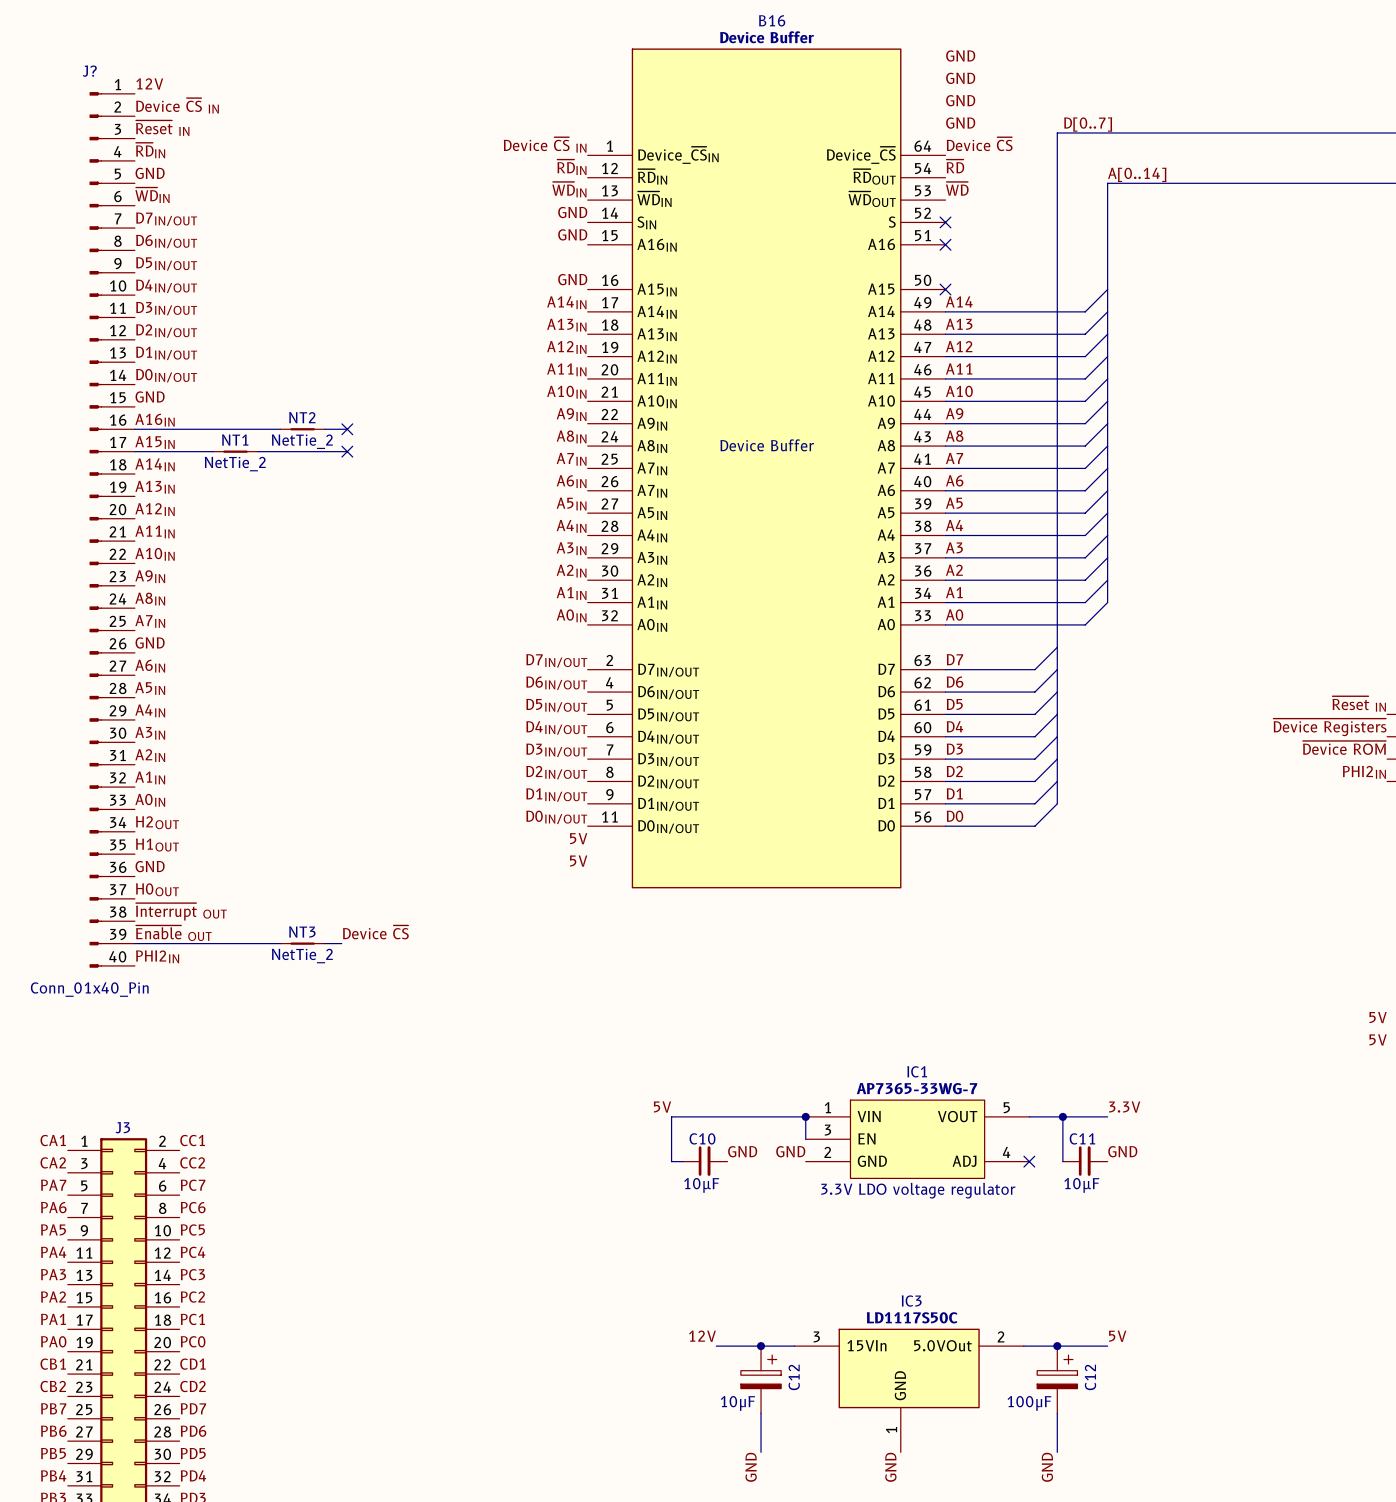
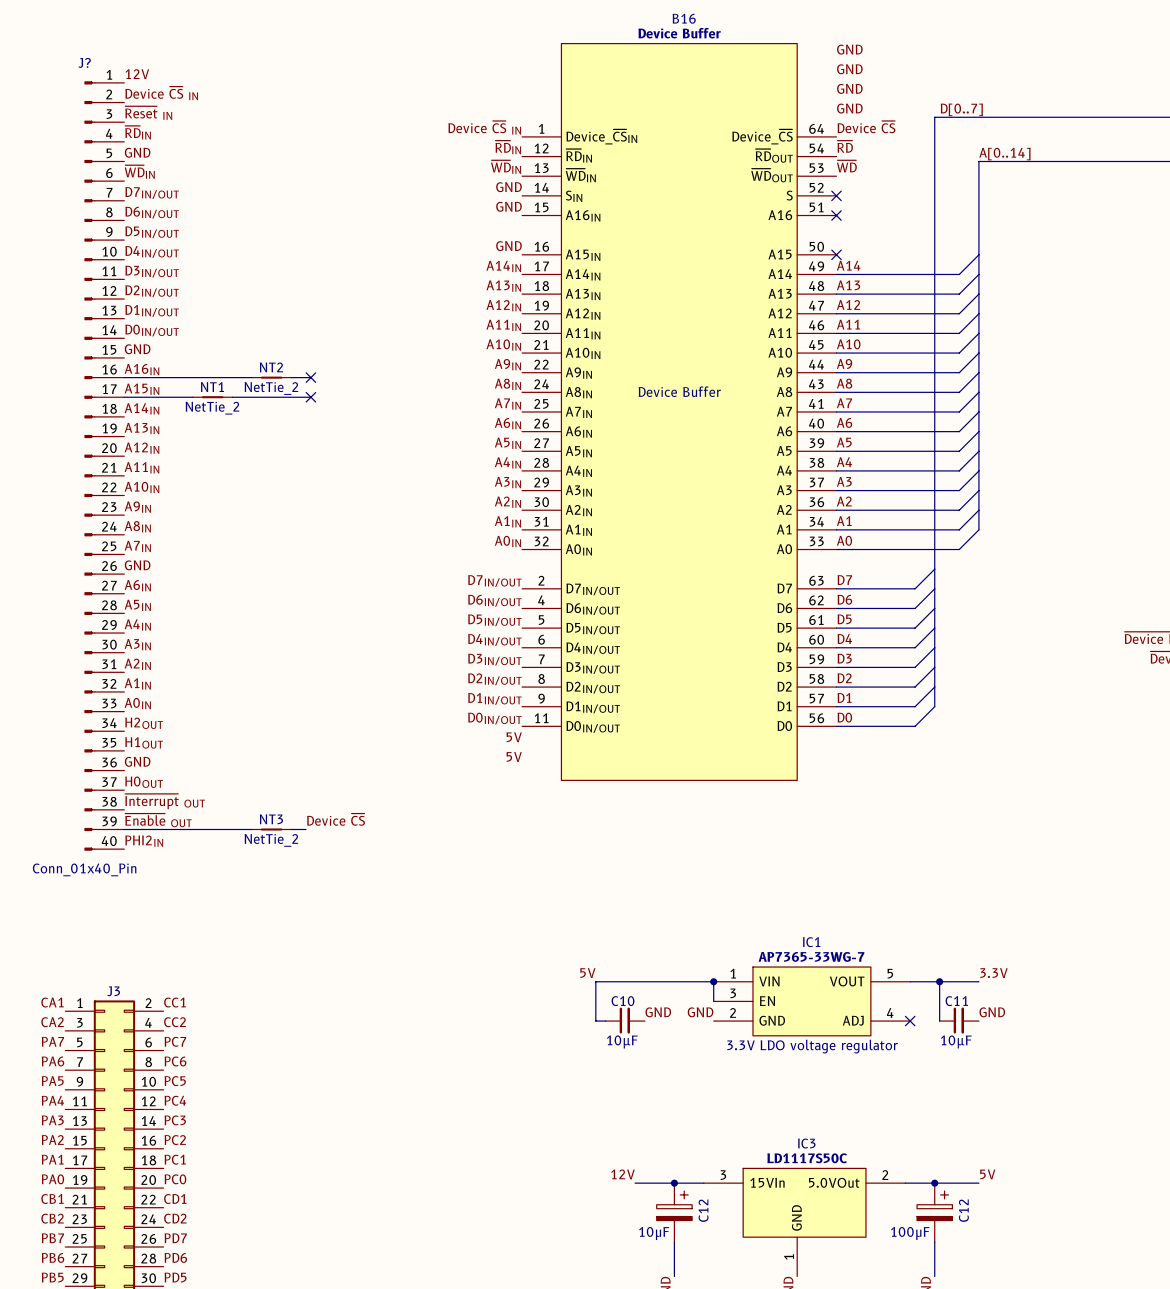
B16 pin name: A7IN (652, 491) -> A6IN (578, 432)

